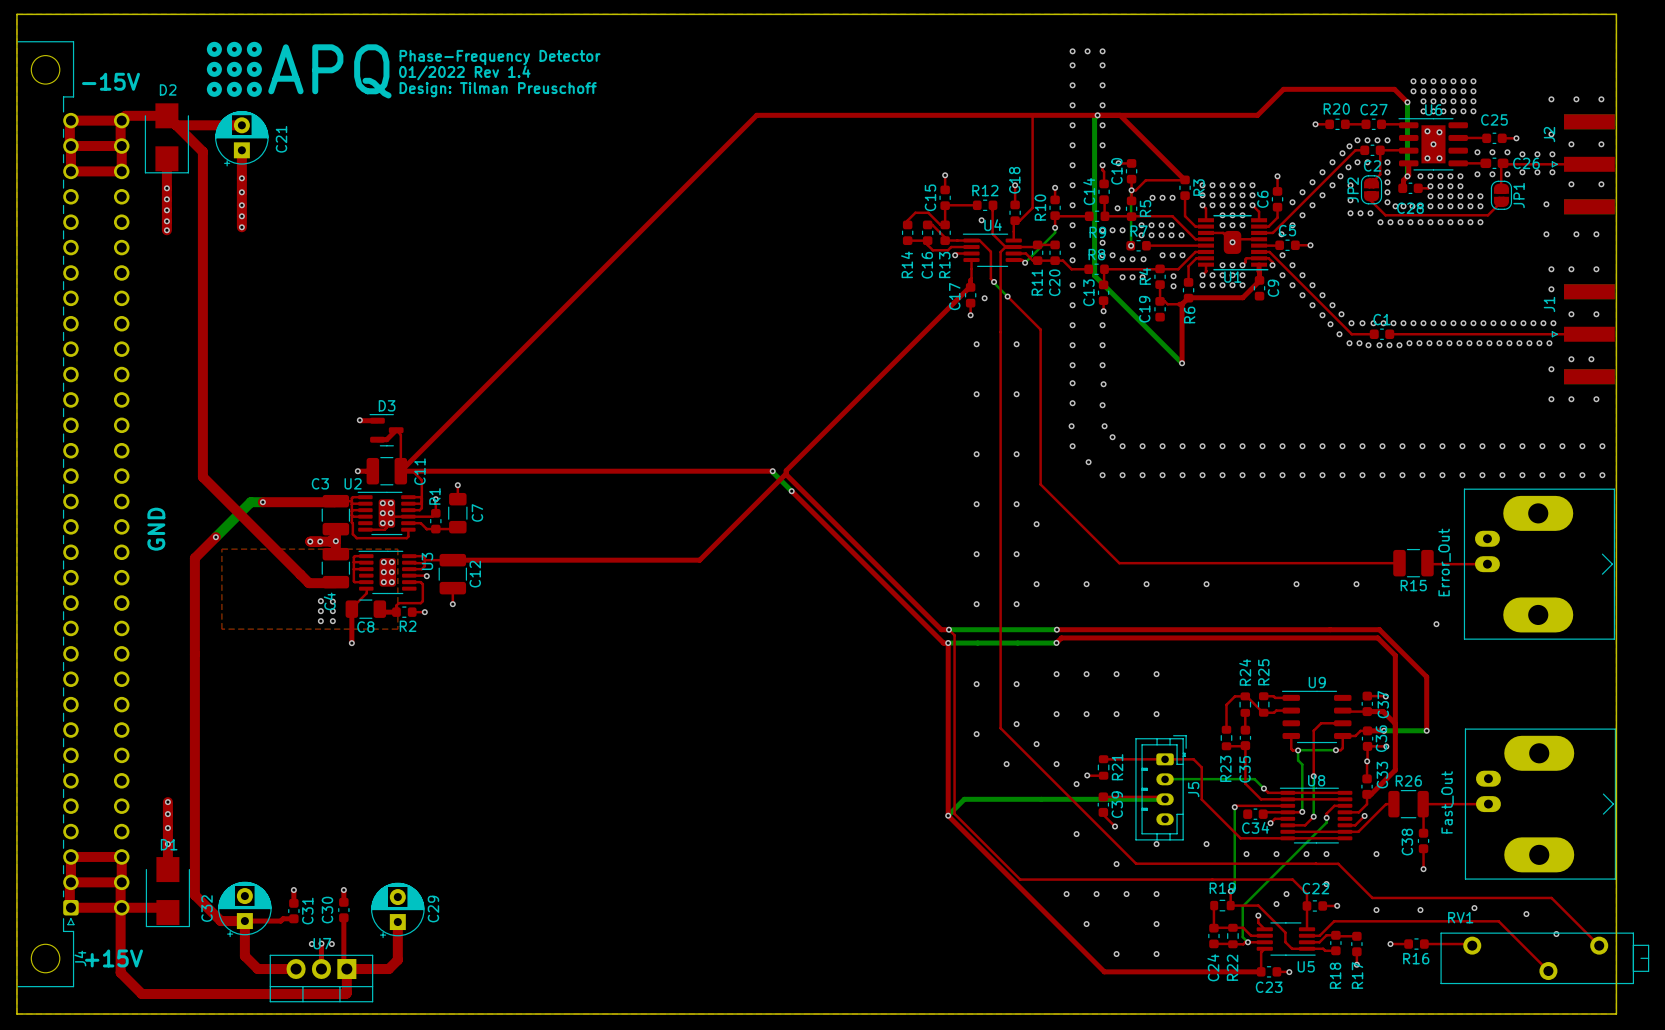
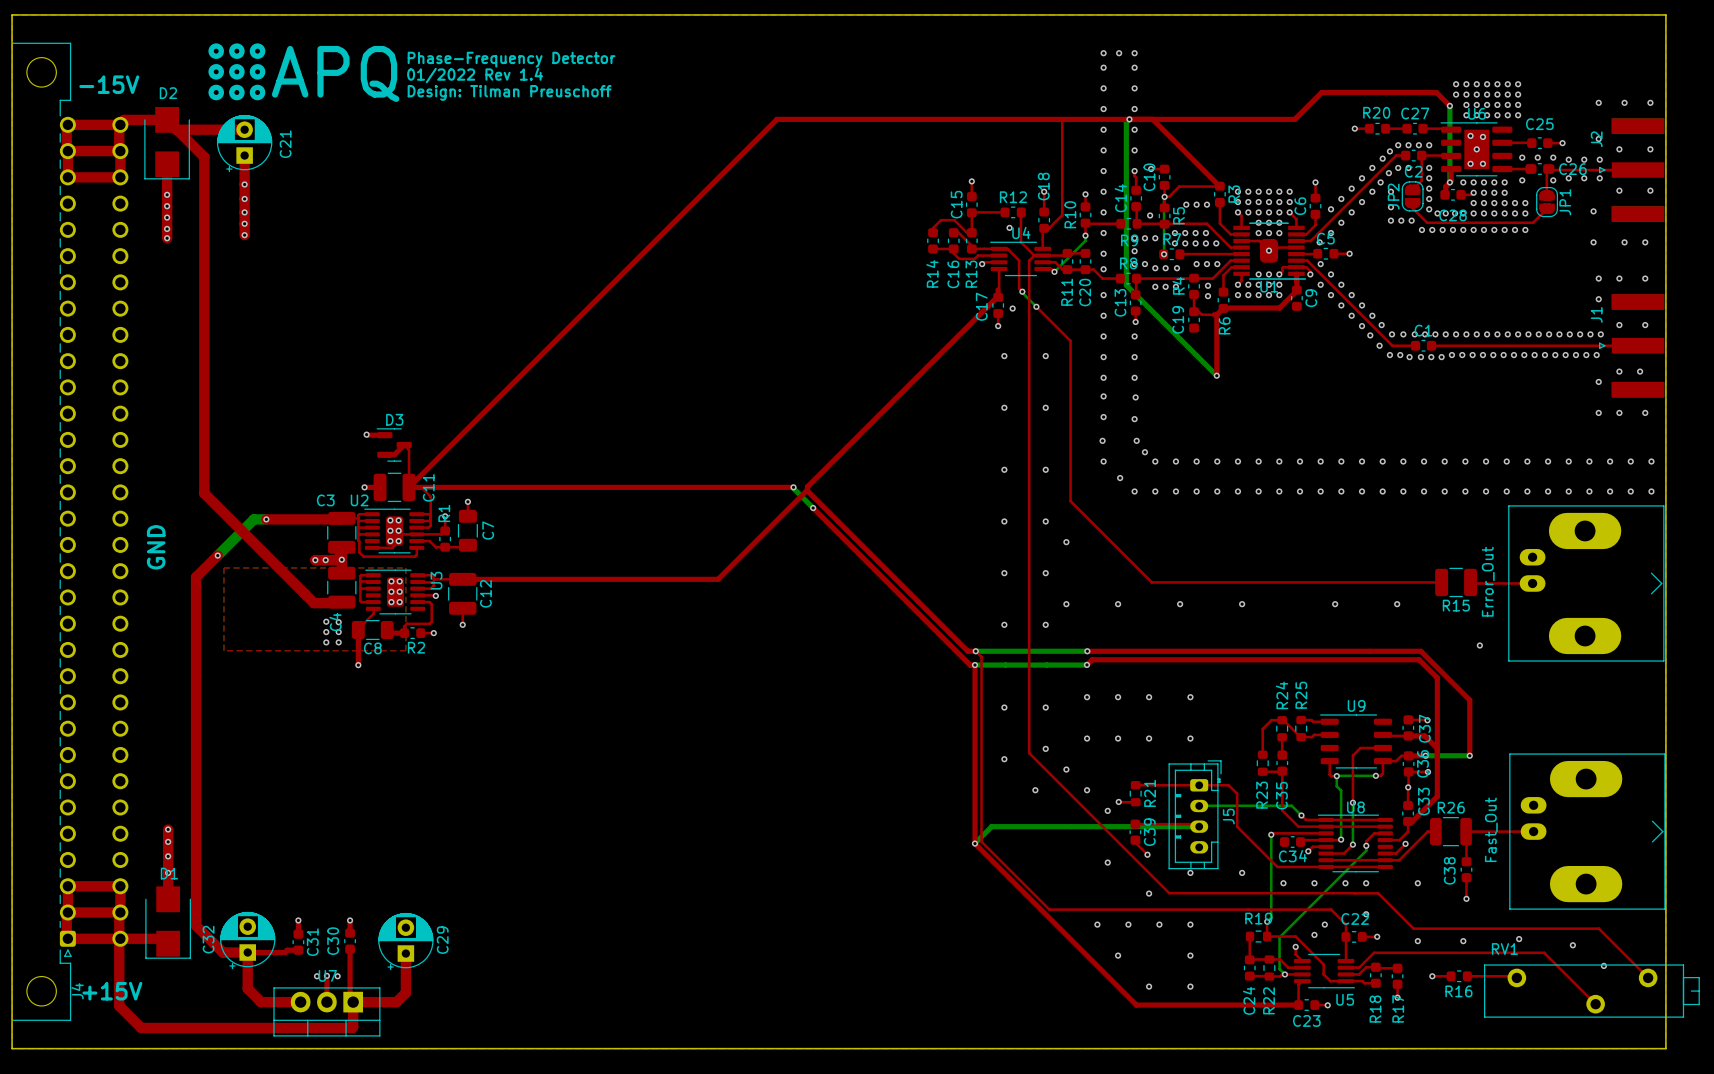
via: (1492, 174) -> none

